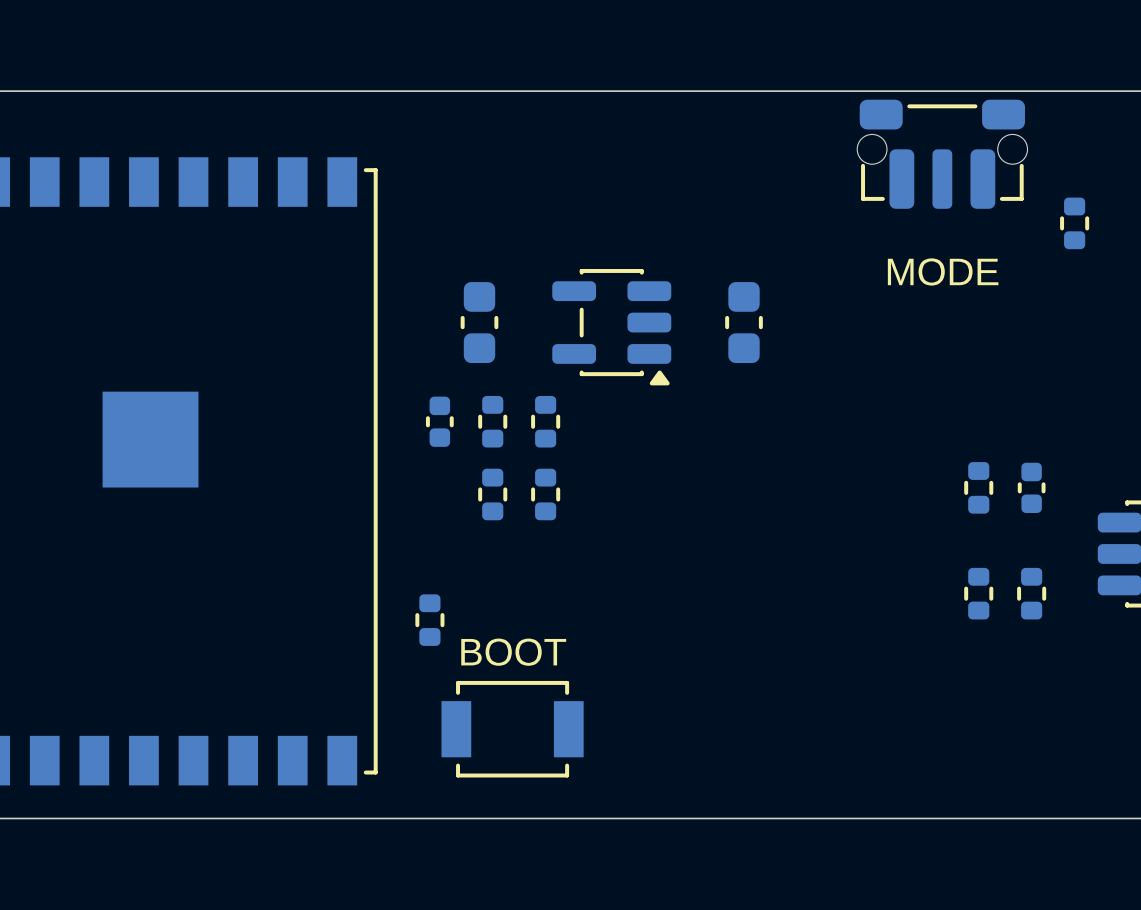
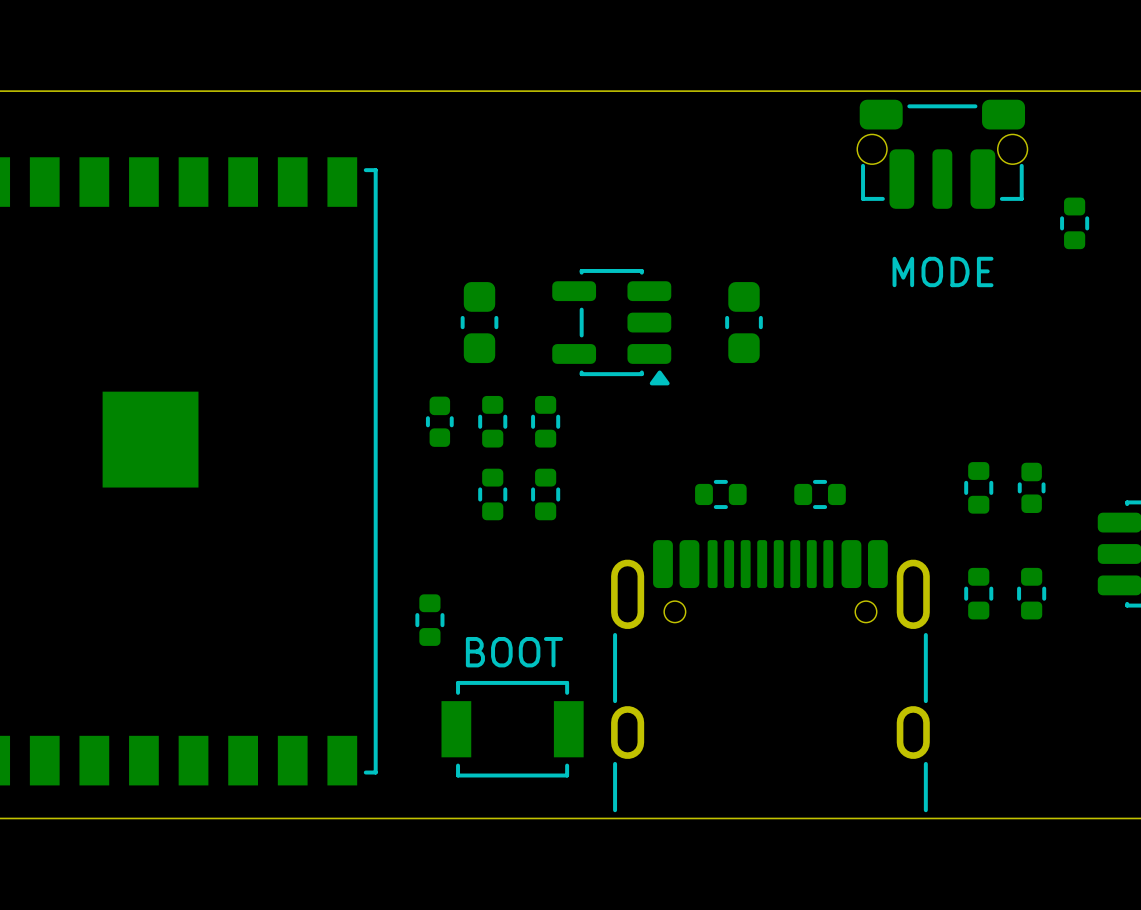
part: none -> (720, 494)
part: none -> (820, 494)
part: none -> (770, 676)

